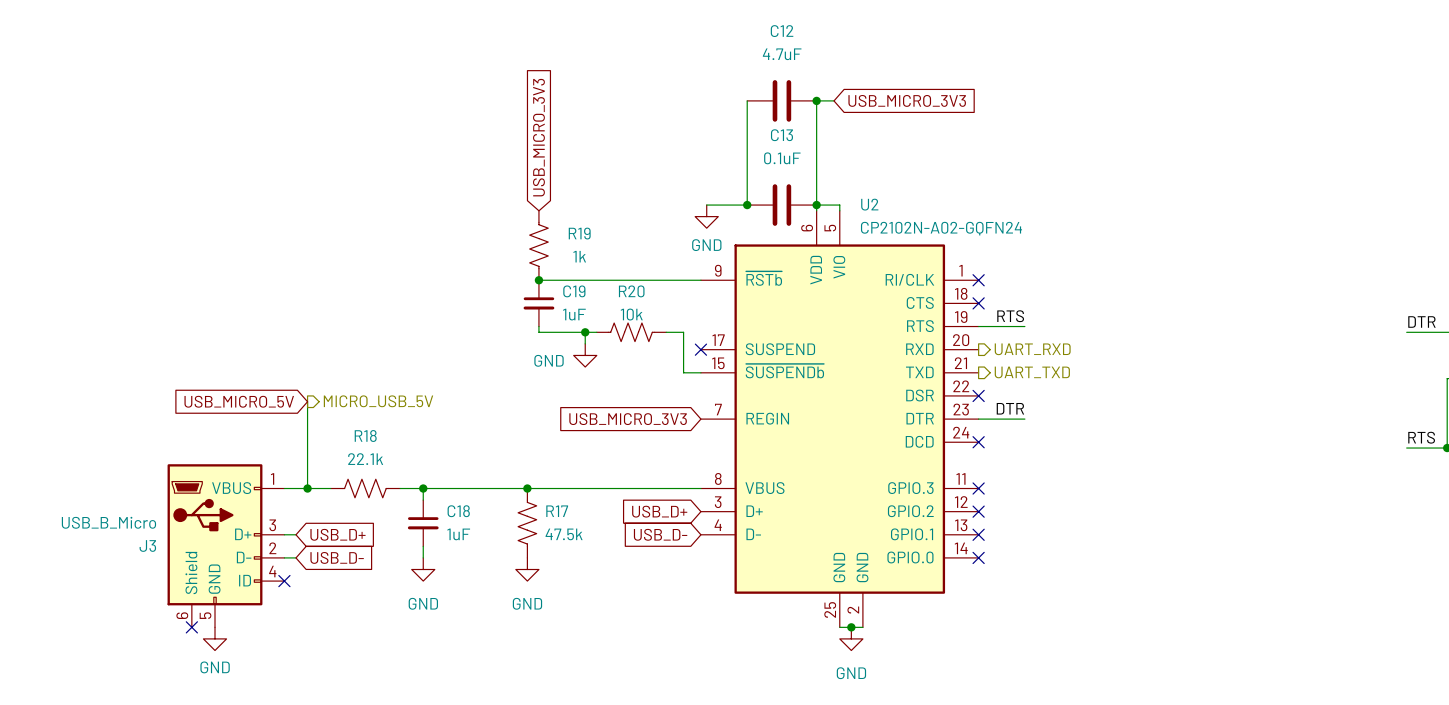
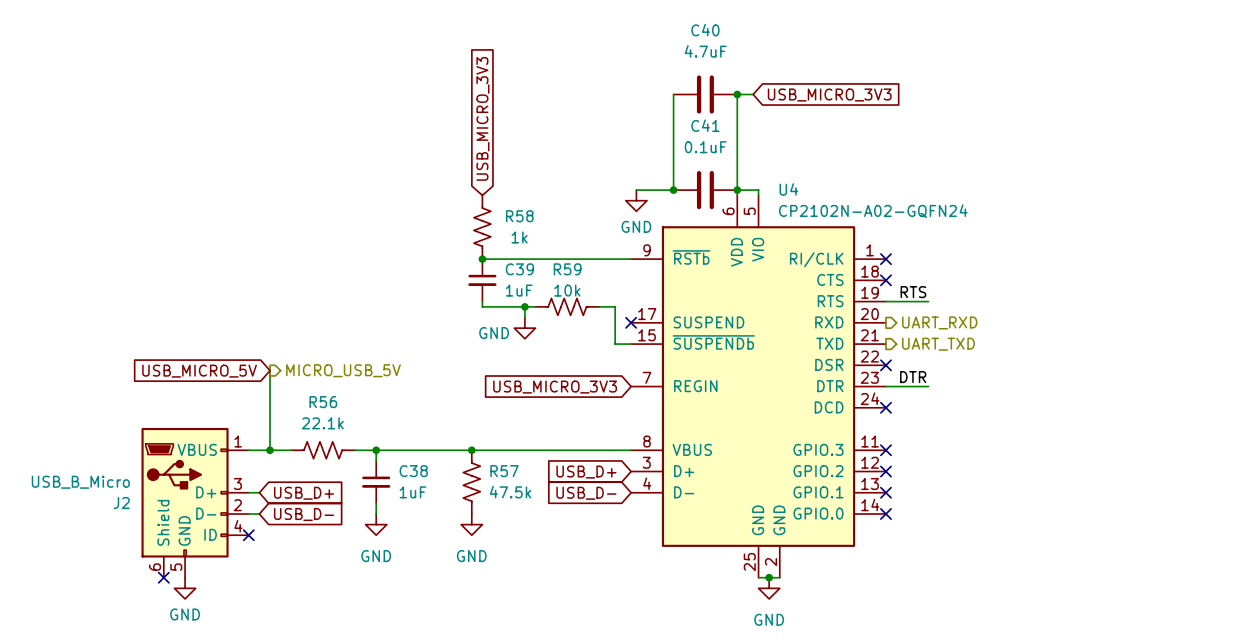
C12 name: C12 (782, 31) -> C40 (705, 30)
C13 name: C13 (781, 135) -> C41 (705, 125)
U2 name: U2 (869, 204) -> U4 (788, 189)
R19 name: R19 (579, 233) -> R58 (519, 216)
C19 name: C19 (574, 291) -> C39 (519, 269)
R20 name: R20 (631, 291) -> R59 (567, 269)
R18 name: R18 (365, 436) -> R56 (323, 402)
C18 name: C18 (458, 511) -> C38 (413, 471)
R17 name: R17 (557, 511) -> R57 (504, 471)
J3 name: J3 (147, 545) -> J2 (121, 502)

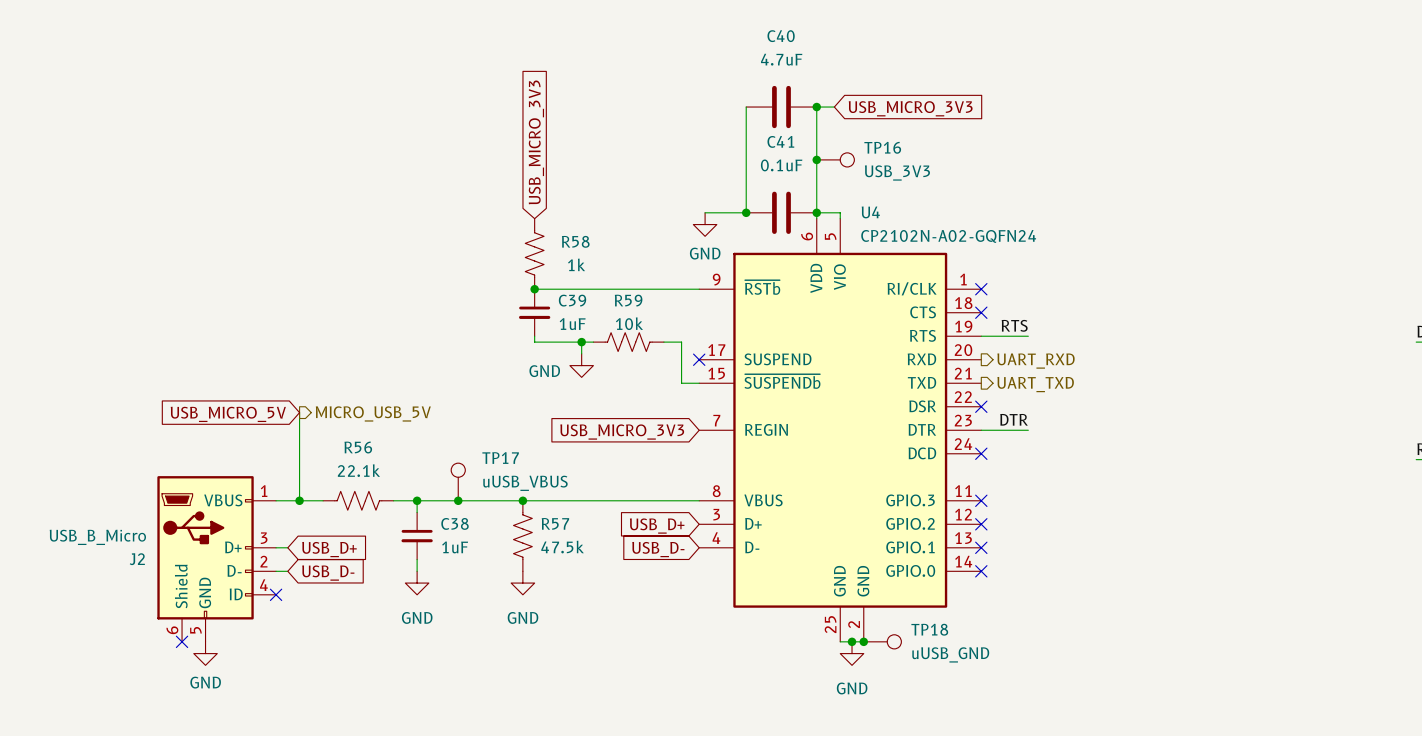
junction: none -> (816, 159)
TP16: none -> USB_3V3 (835, 159)
TP17: none -> uUSB_VBUS (458, 481)
junction: none -> (458, 500)
junction: none -> (863, 641)
TP18: none -> uUSB_GND (882, 641)

